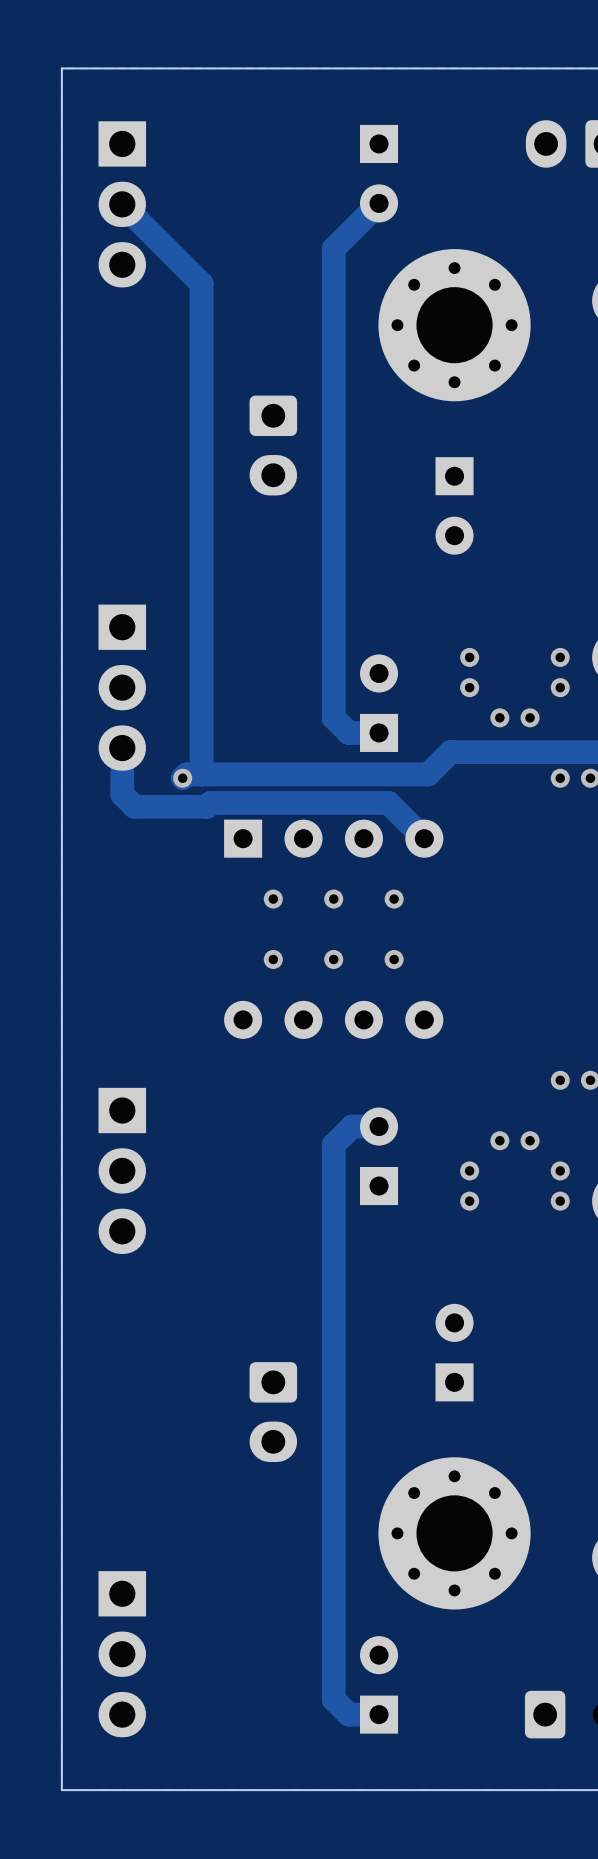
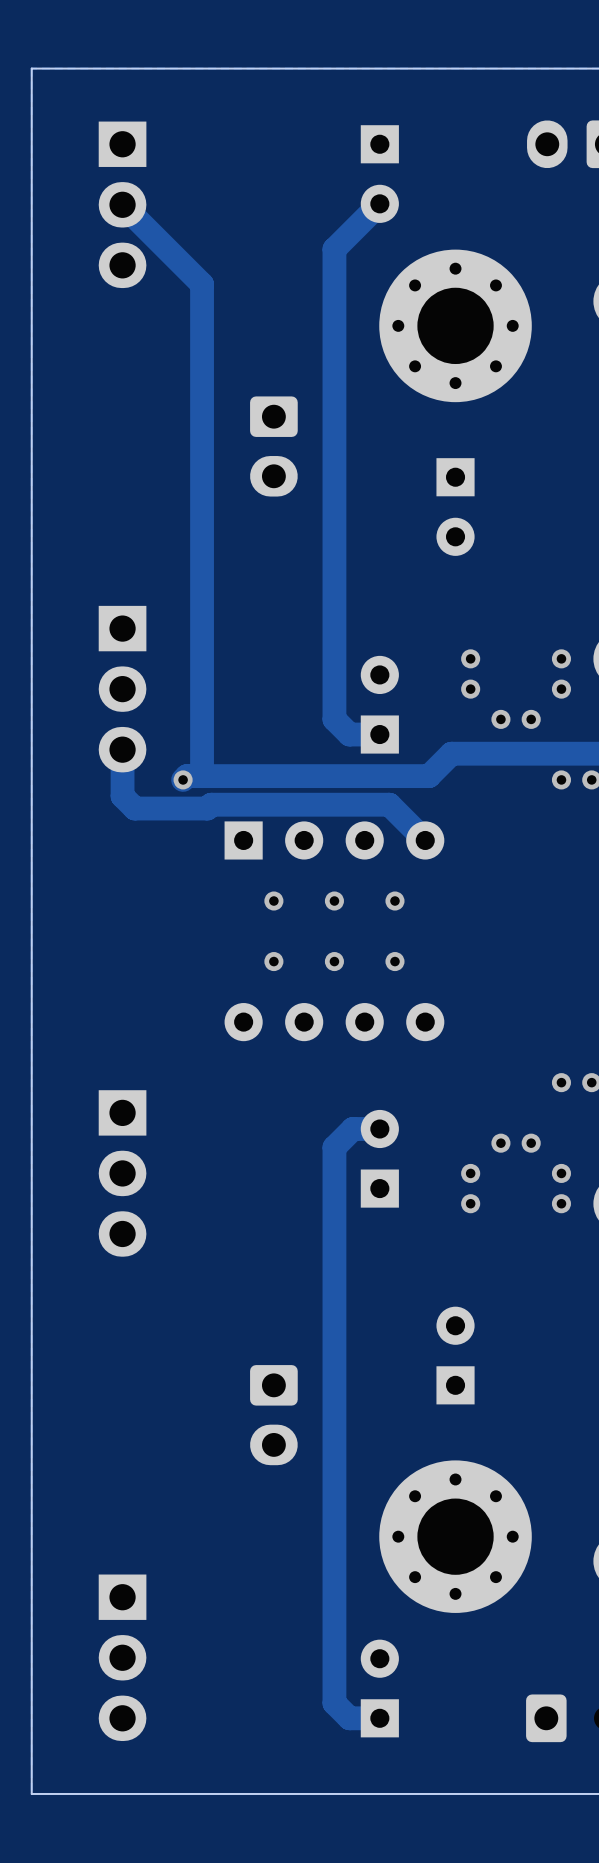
board edge: (61, 68) (61, 1790) -> (62, 68) (31, 68) (31, 1793) (62, 1793)

